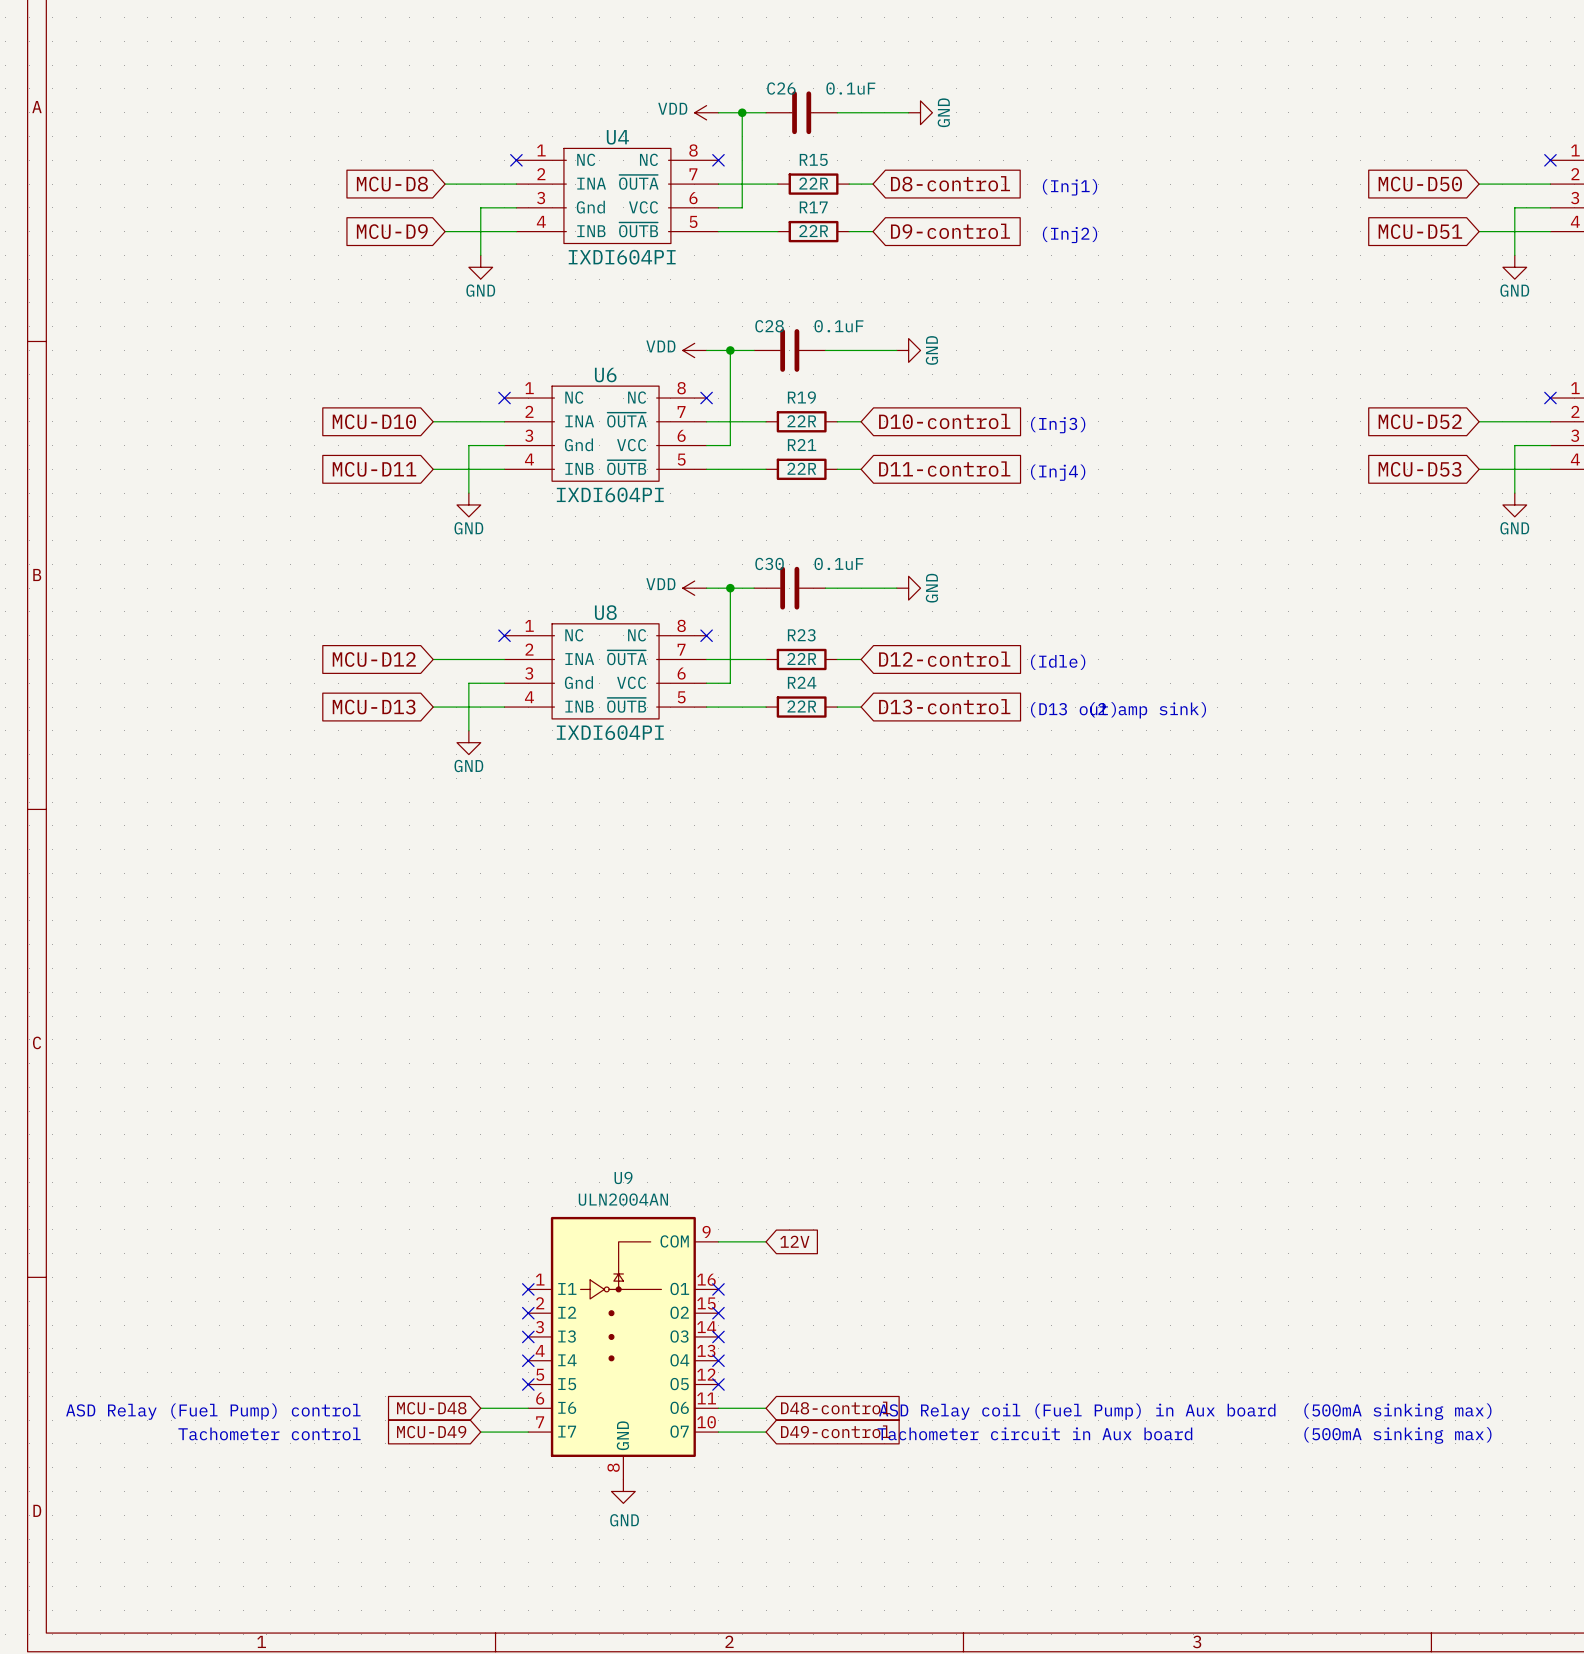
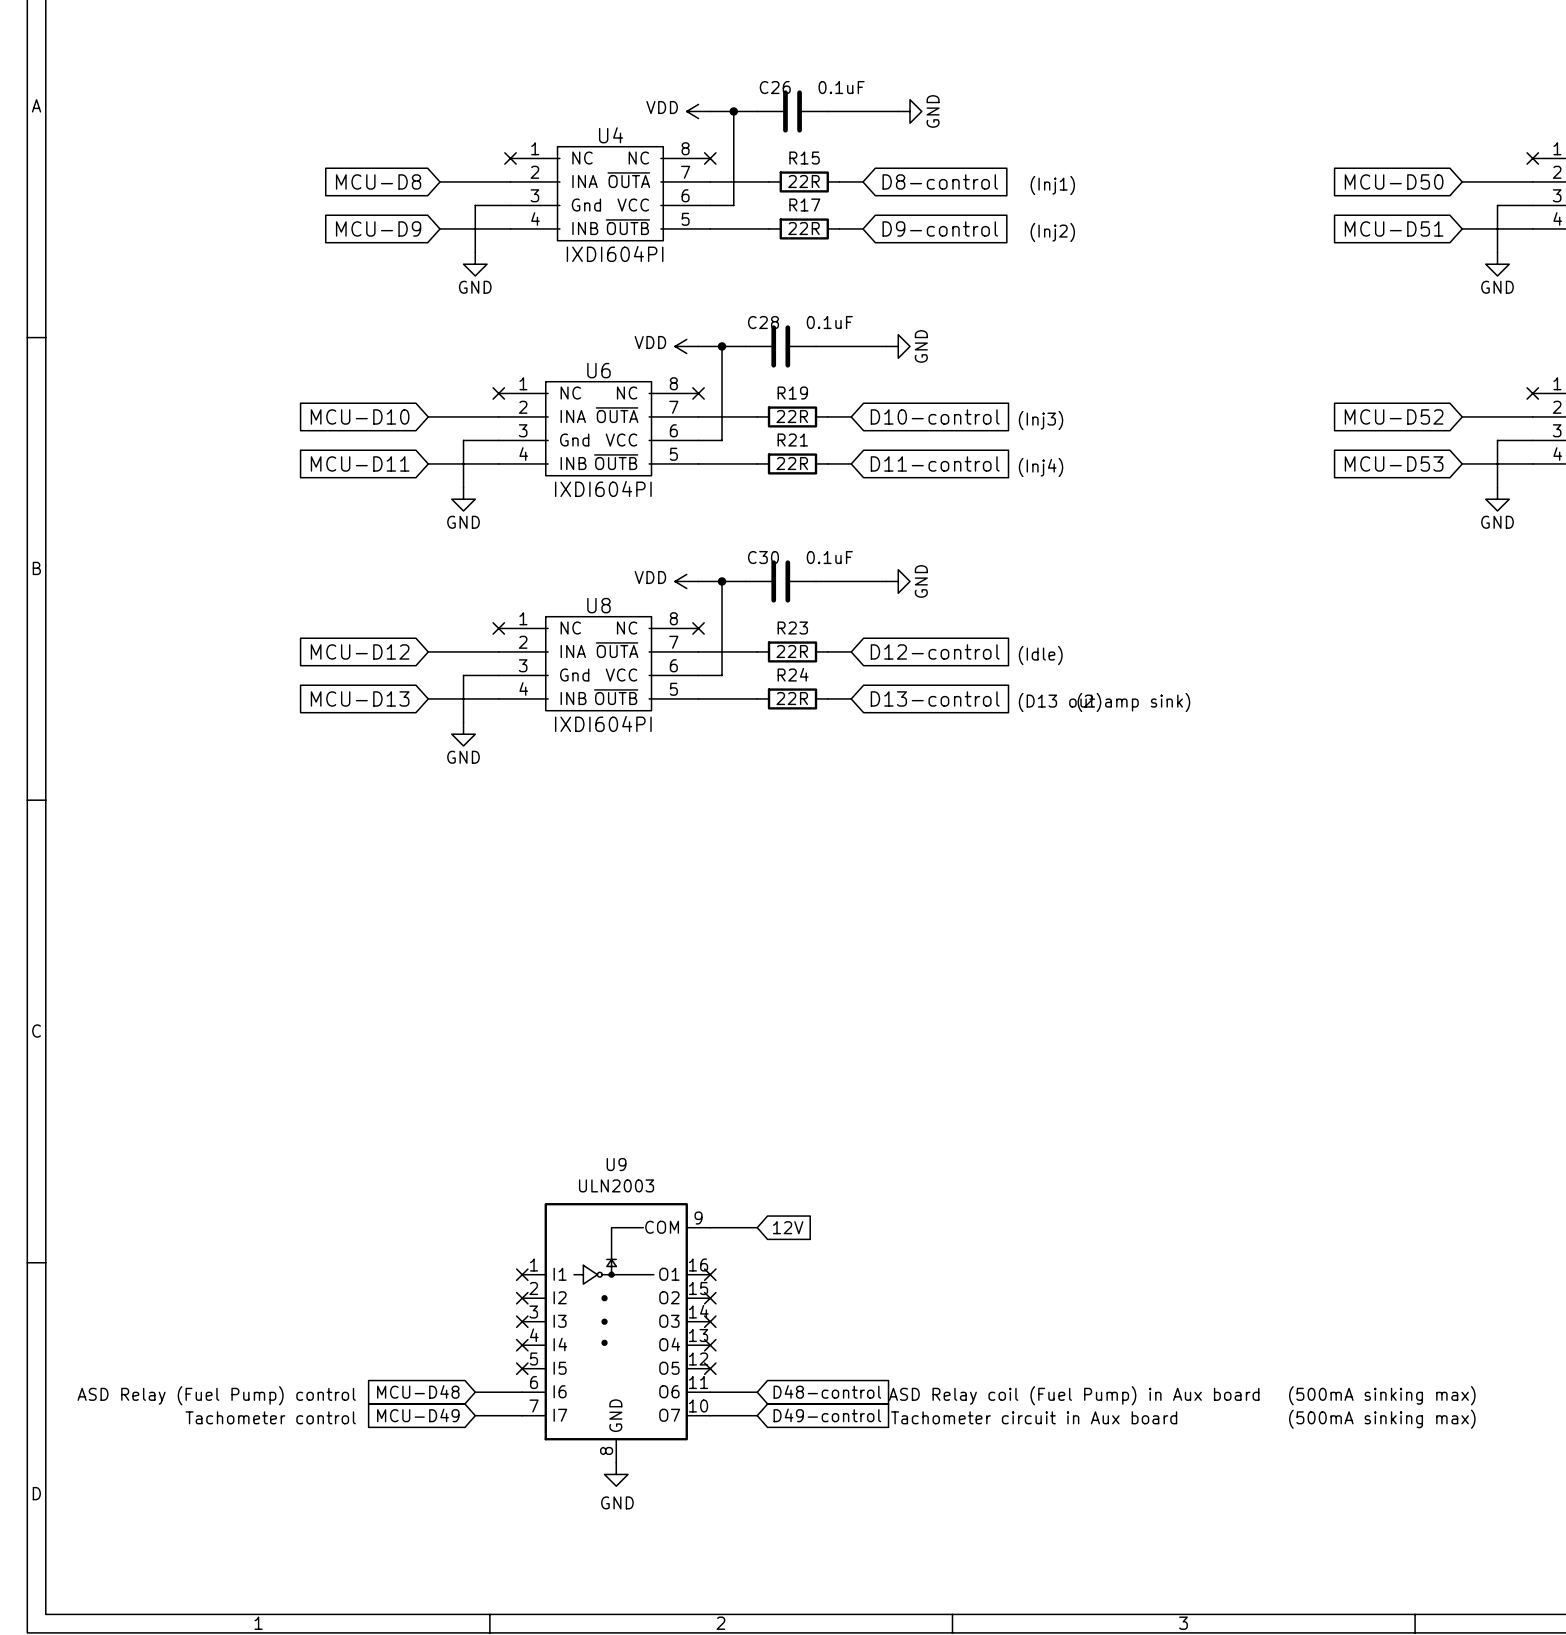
U9 value: ULN2004AN (623, 1199) -> ULN2003 (616, 1185)

